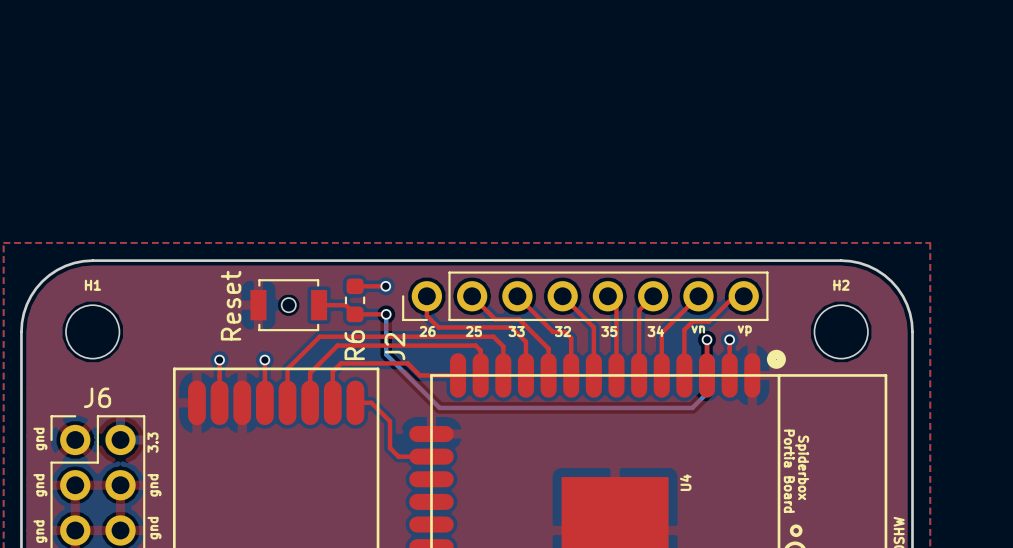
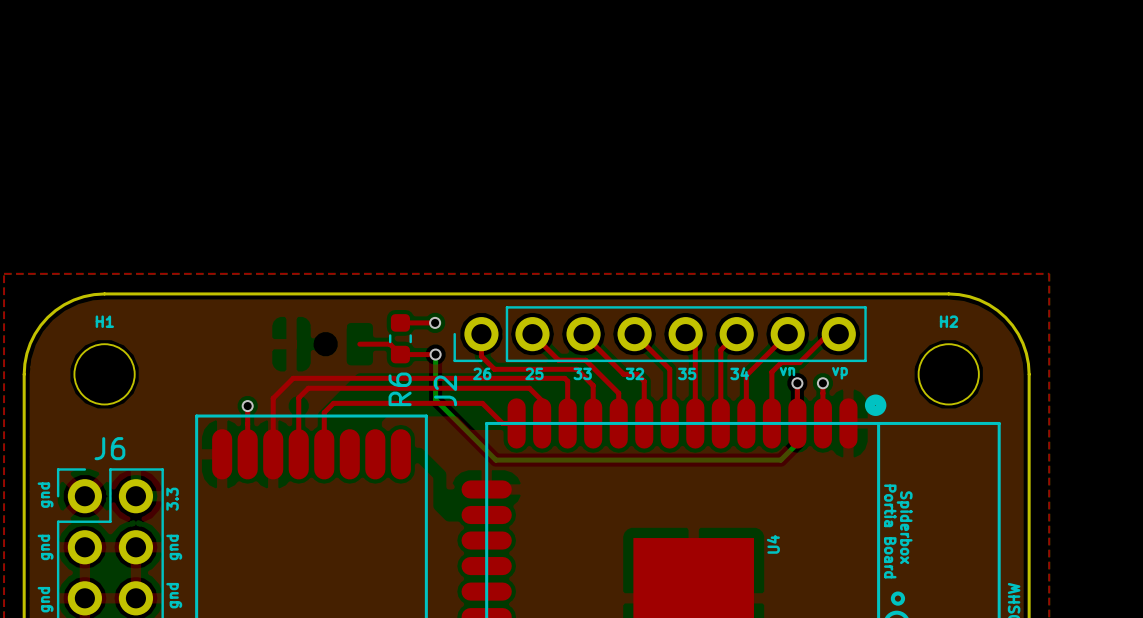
Reset: (288, 305) -> none
top track: (503, 346) (493, 336) (319, 336) (287, 368) -> (567, 390) (567, 381) (564, 378) (293, 378) (273, 398) (273, 454)
top track: (480, 355) (480, 350) (475, 345) (337, 345) (310, 373) (310, 402) -> (542, 400) (529, 388) (308, 388) (298, 397) (298, 406)
via: (264, 360) -> none
top track: (445, 375) (419, 375) (407, 363) (340, 363) (332, 371) (332, 402) -> (502, 423) (482, 403) (333, 403) (324, 412) (324, 416)
top track: (355, 402) (371, 402) (389, 421) (389, 448) (398, 456) (431, 456) -> none

